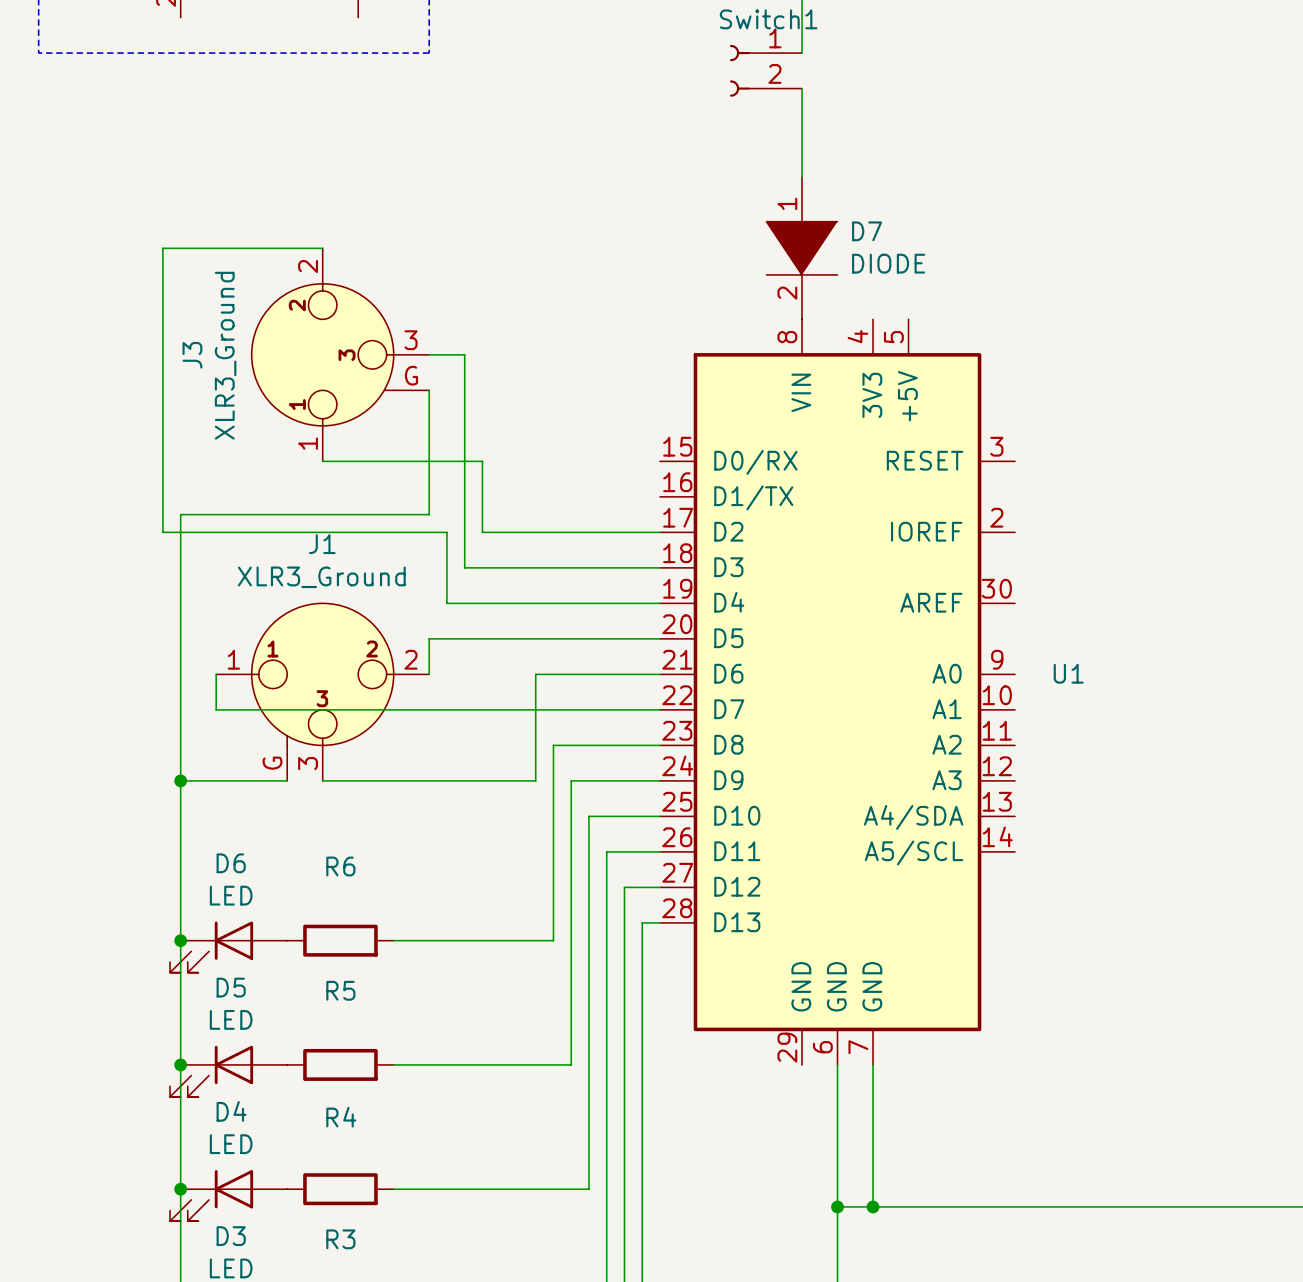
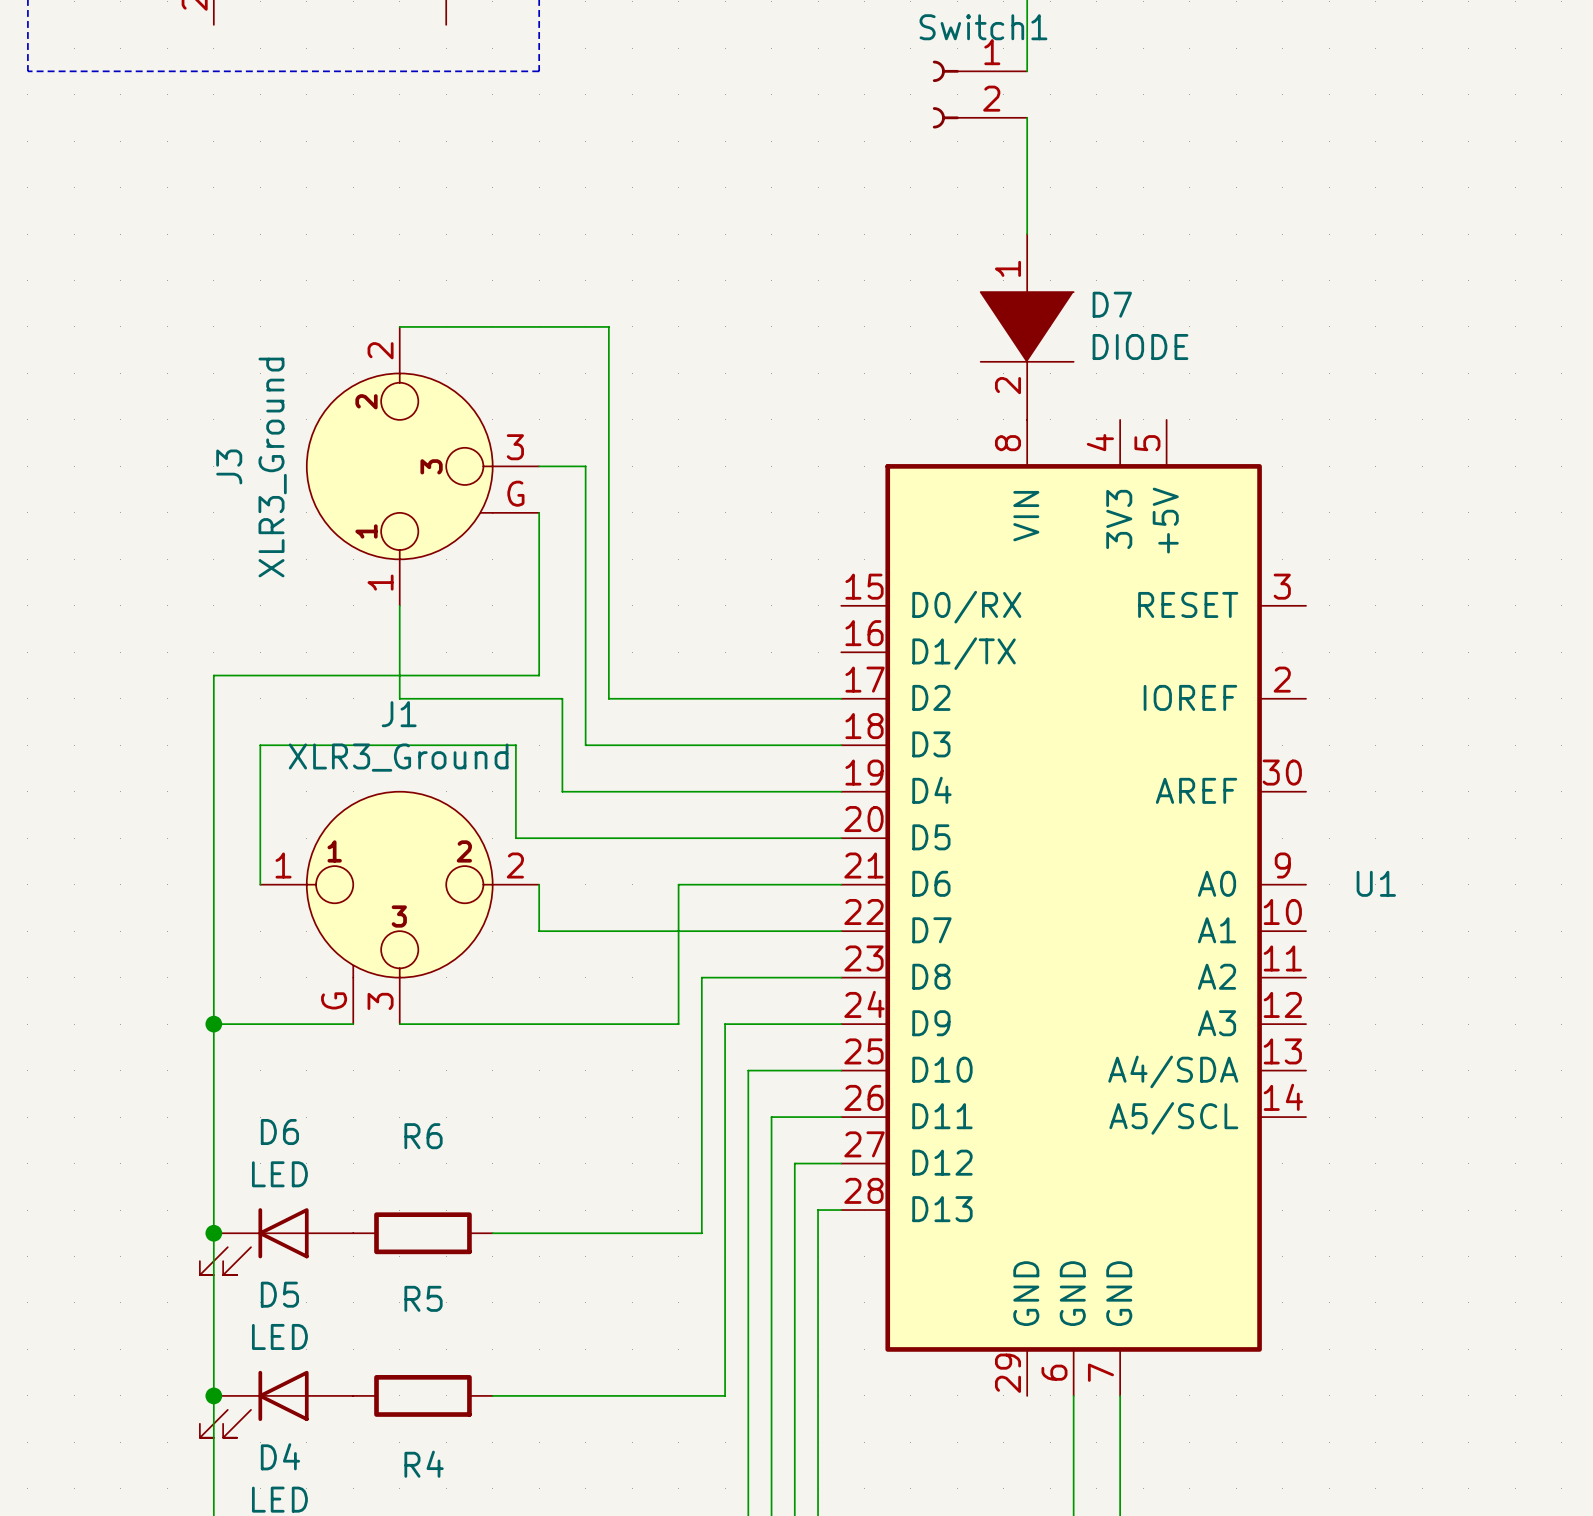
wire: (322, 248) (162, 248) (162, 532) (322, 532) -> (399, 326) (608, 326) (608, 605)
wire: (322, 461) (482, 461) -> (399, 605) (399, 698)
wire: (429, 638) (429, 674) -> (539, 931) (539, 884)
wire: (216, 674) (216, 709) (429, 709) -> (260, 884) (260, 745) (515, 745) (515, 838) (539, 838)

